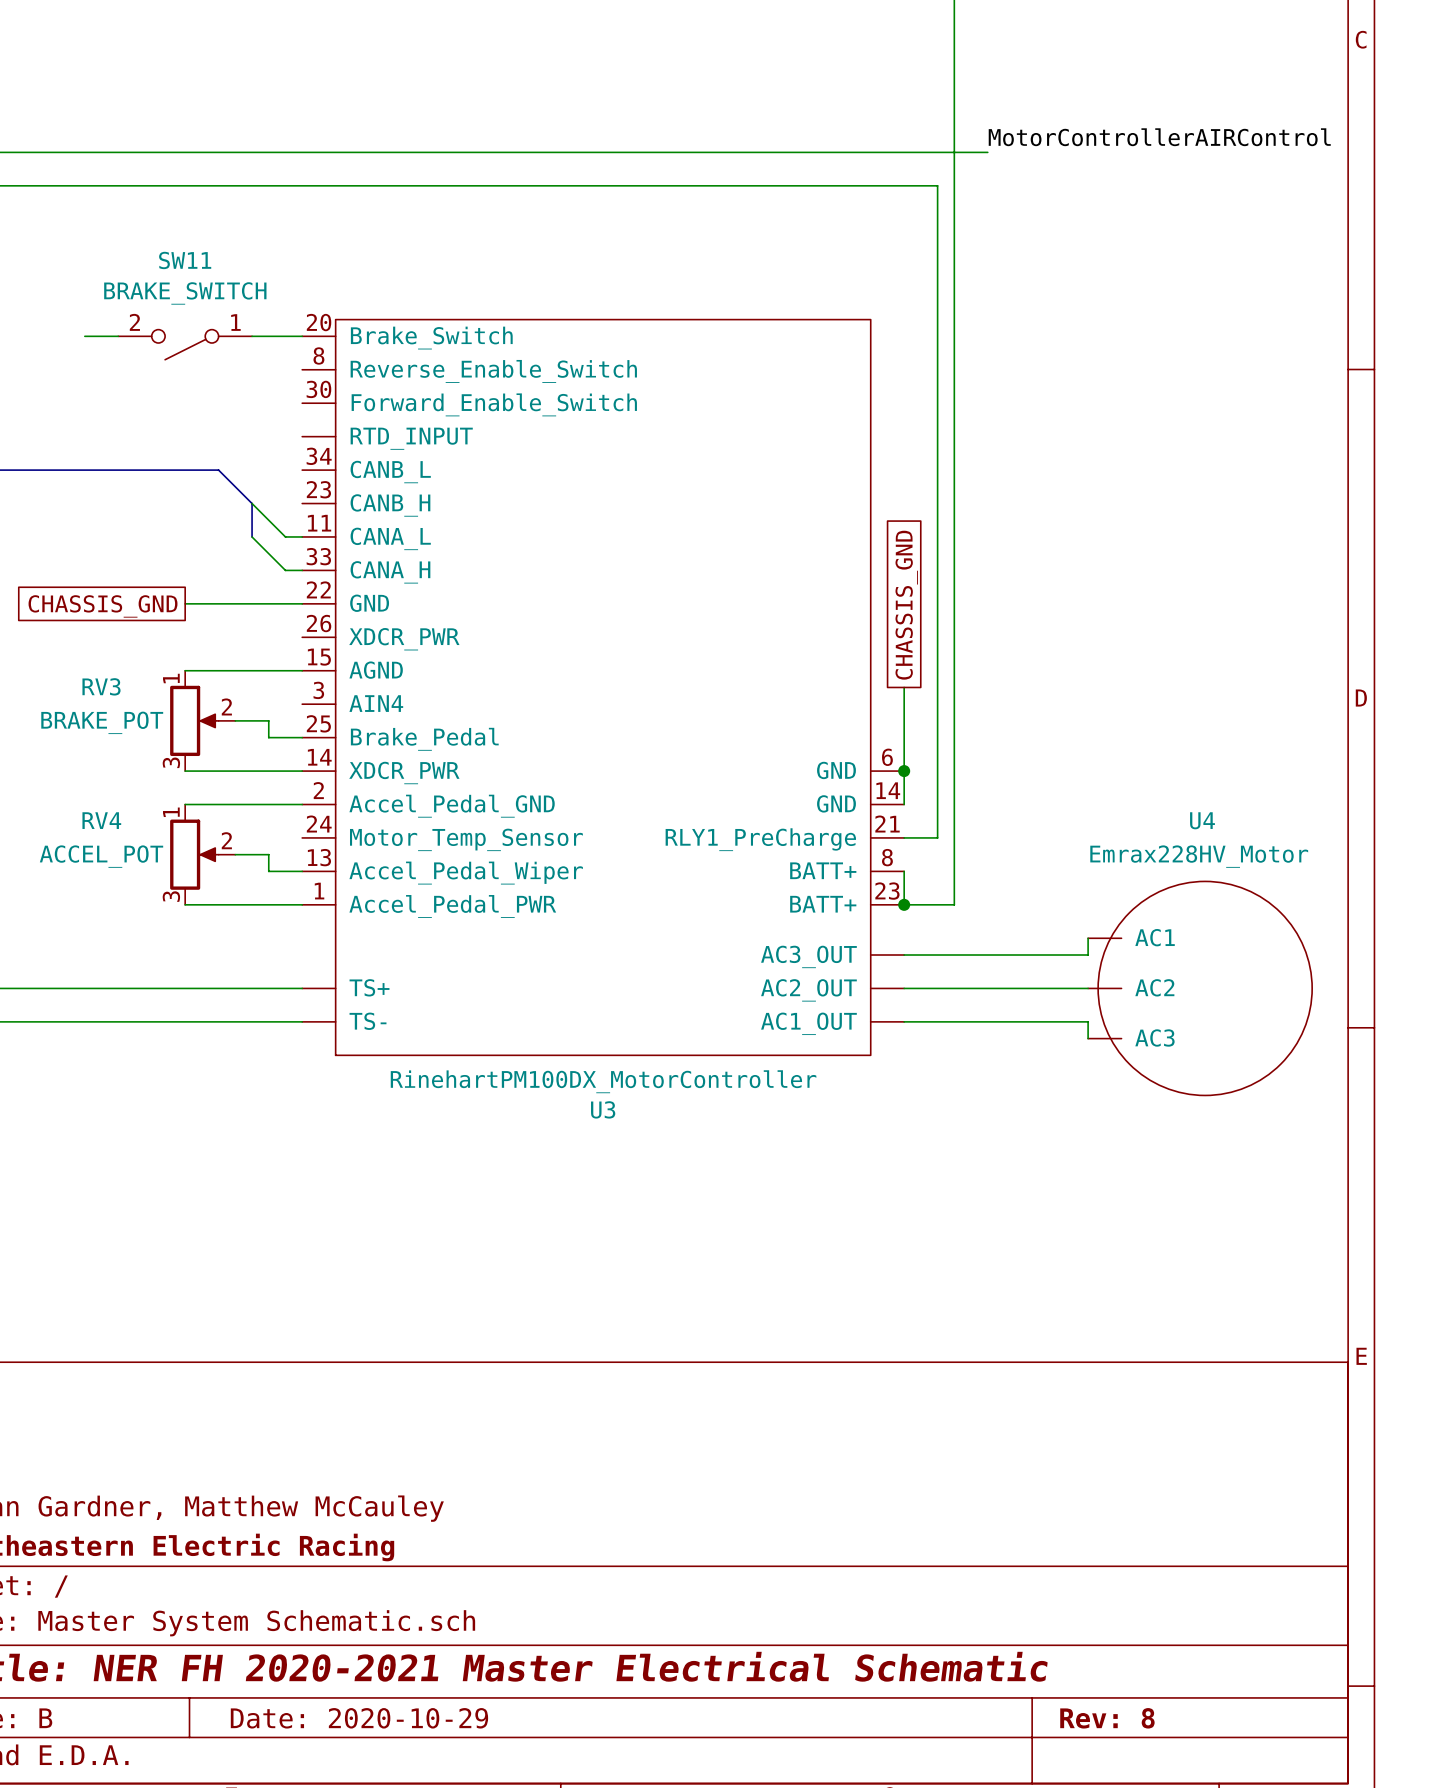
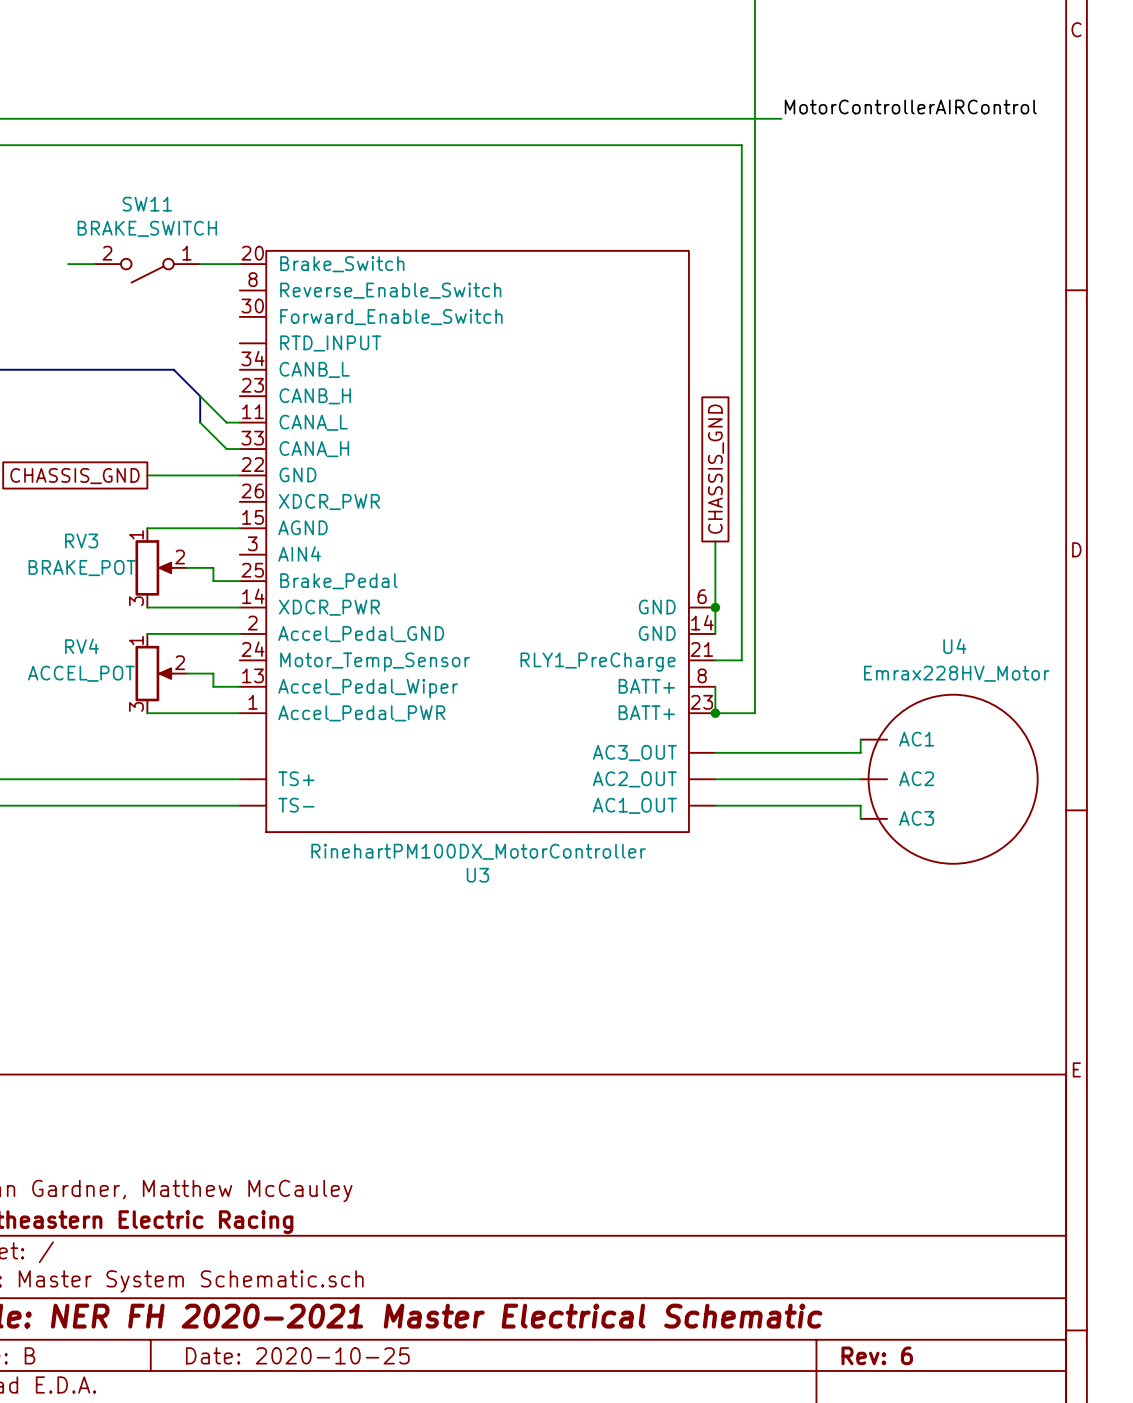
title block: Date: 2020-10-29 (359, 1718) -> Date: 2020-10-25 (297, 1355)
title block: Rev: 8 (1107, 1718) -> Rev: 6 (877, 1355)

